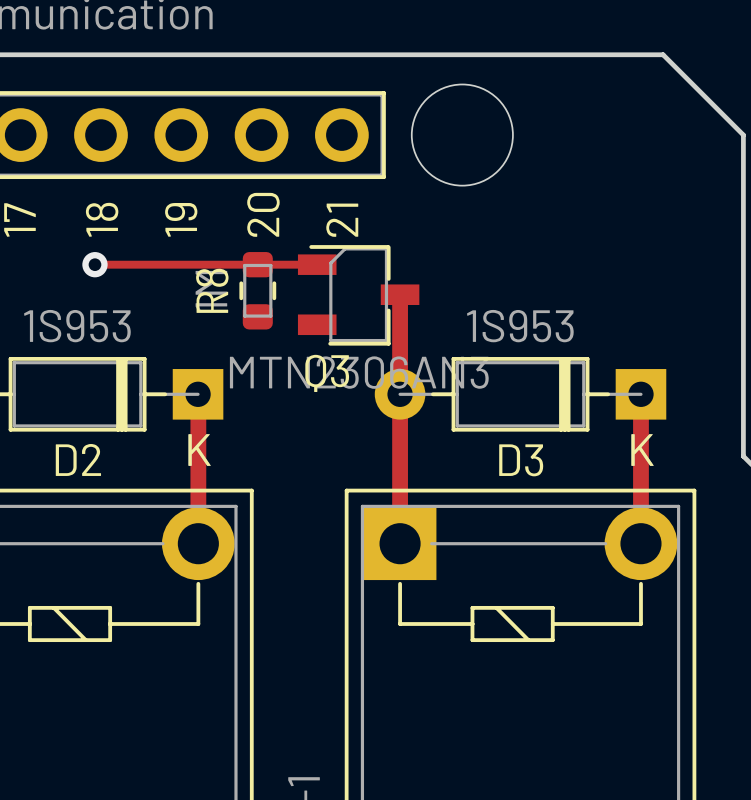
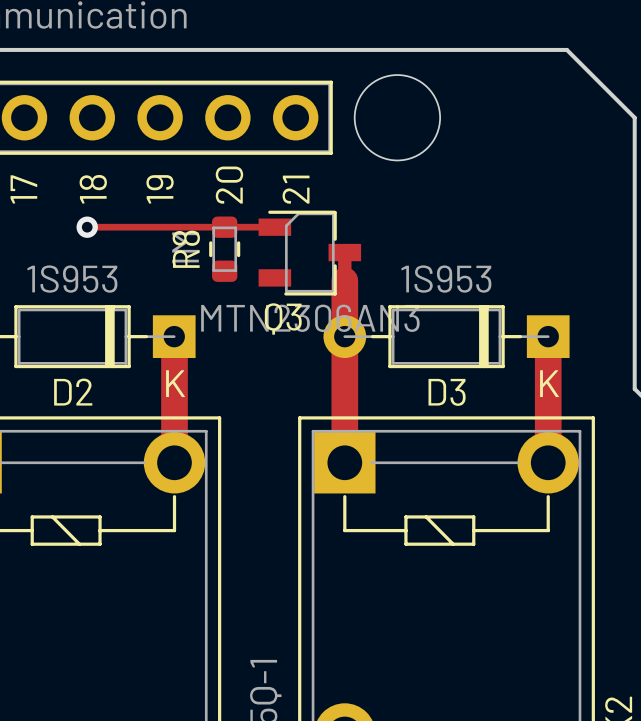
track width: thin (400, 327) (400, 543) -> thick (344, 280) (344, 462)
track width: thin (198, 394) (198, 543) -> thick (174, 336) (174, 462)
track width: thin (640, 394) (640, 543) -> thick (548, 336) (548, 462)

